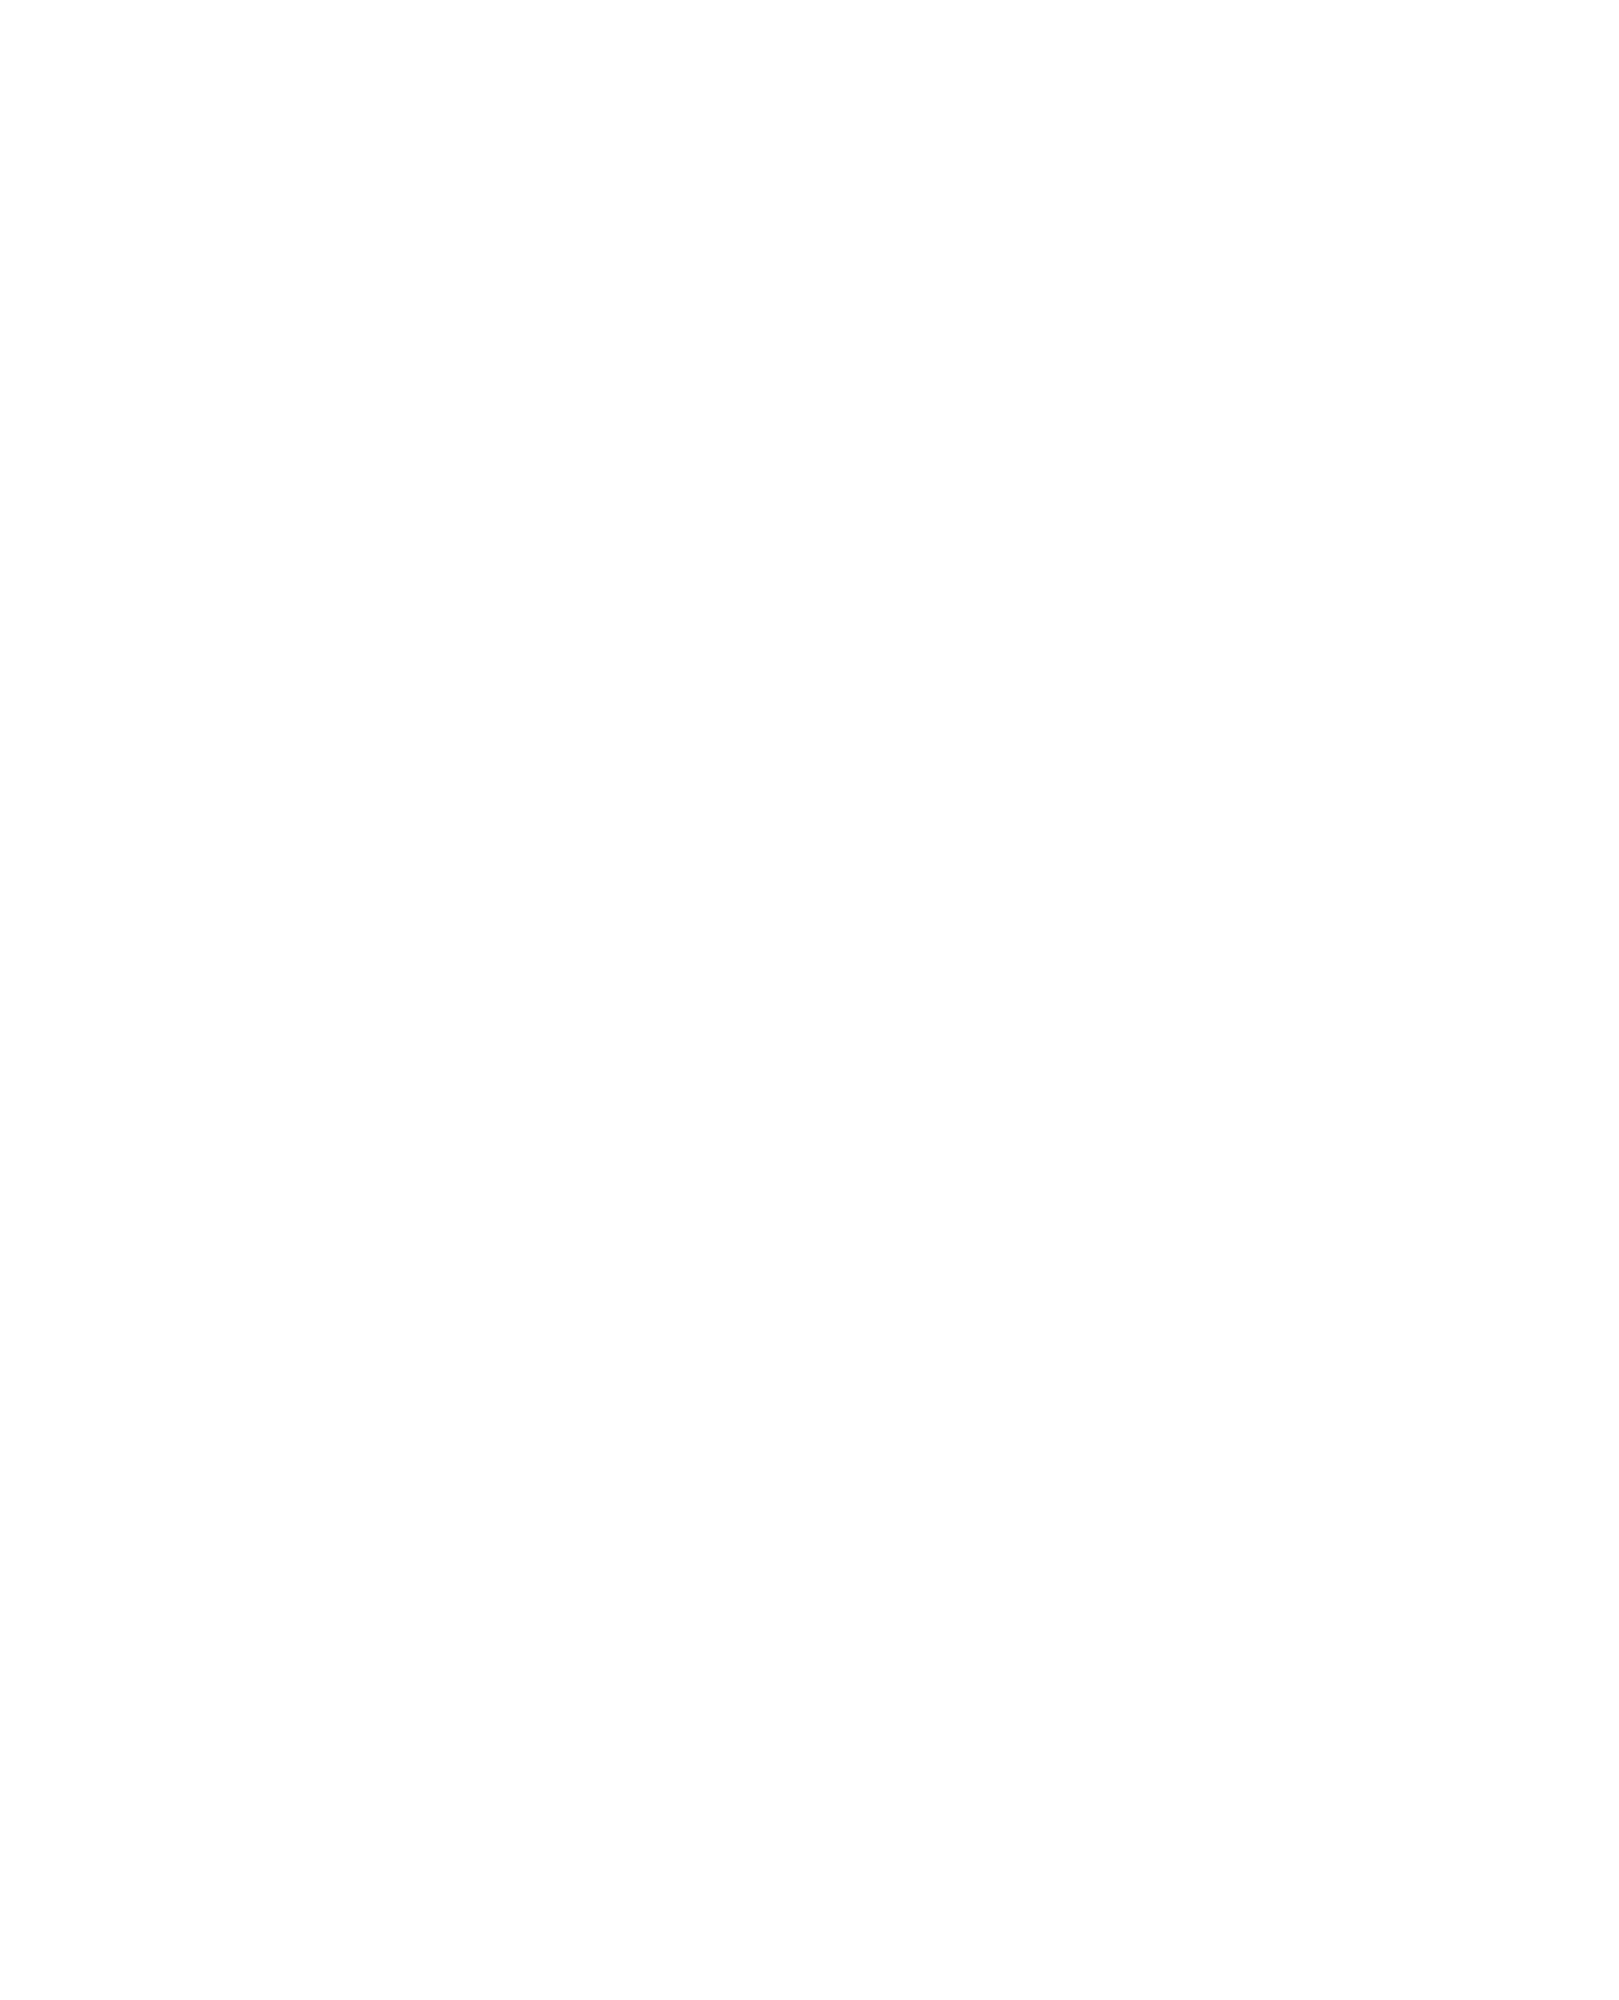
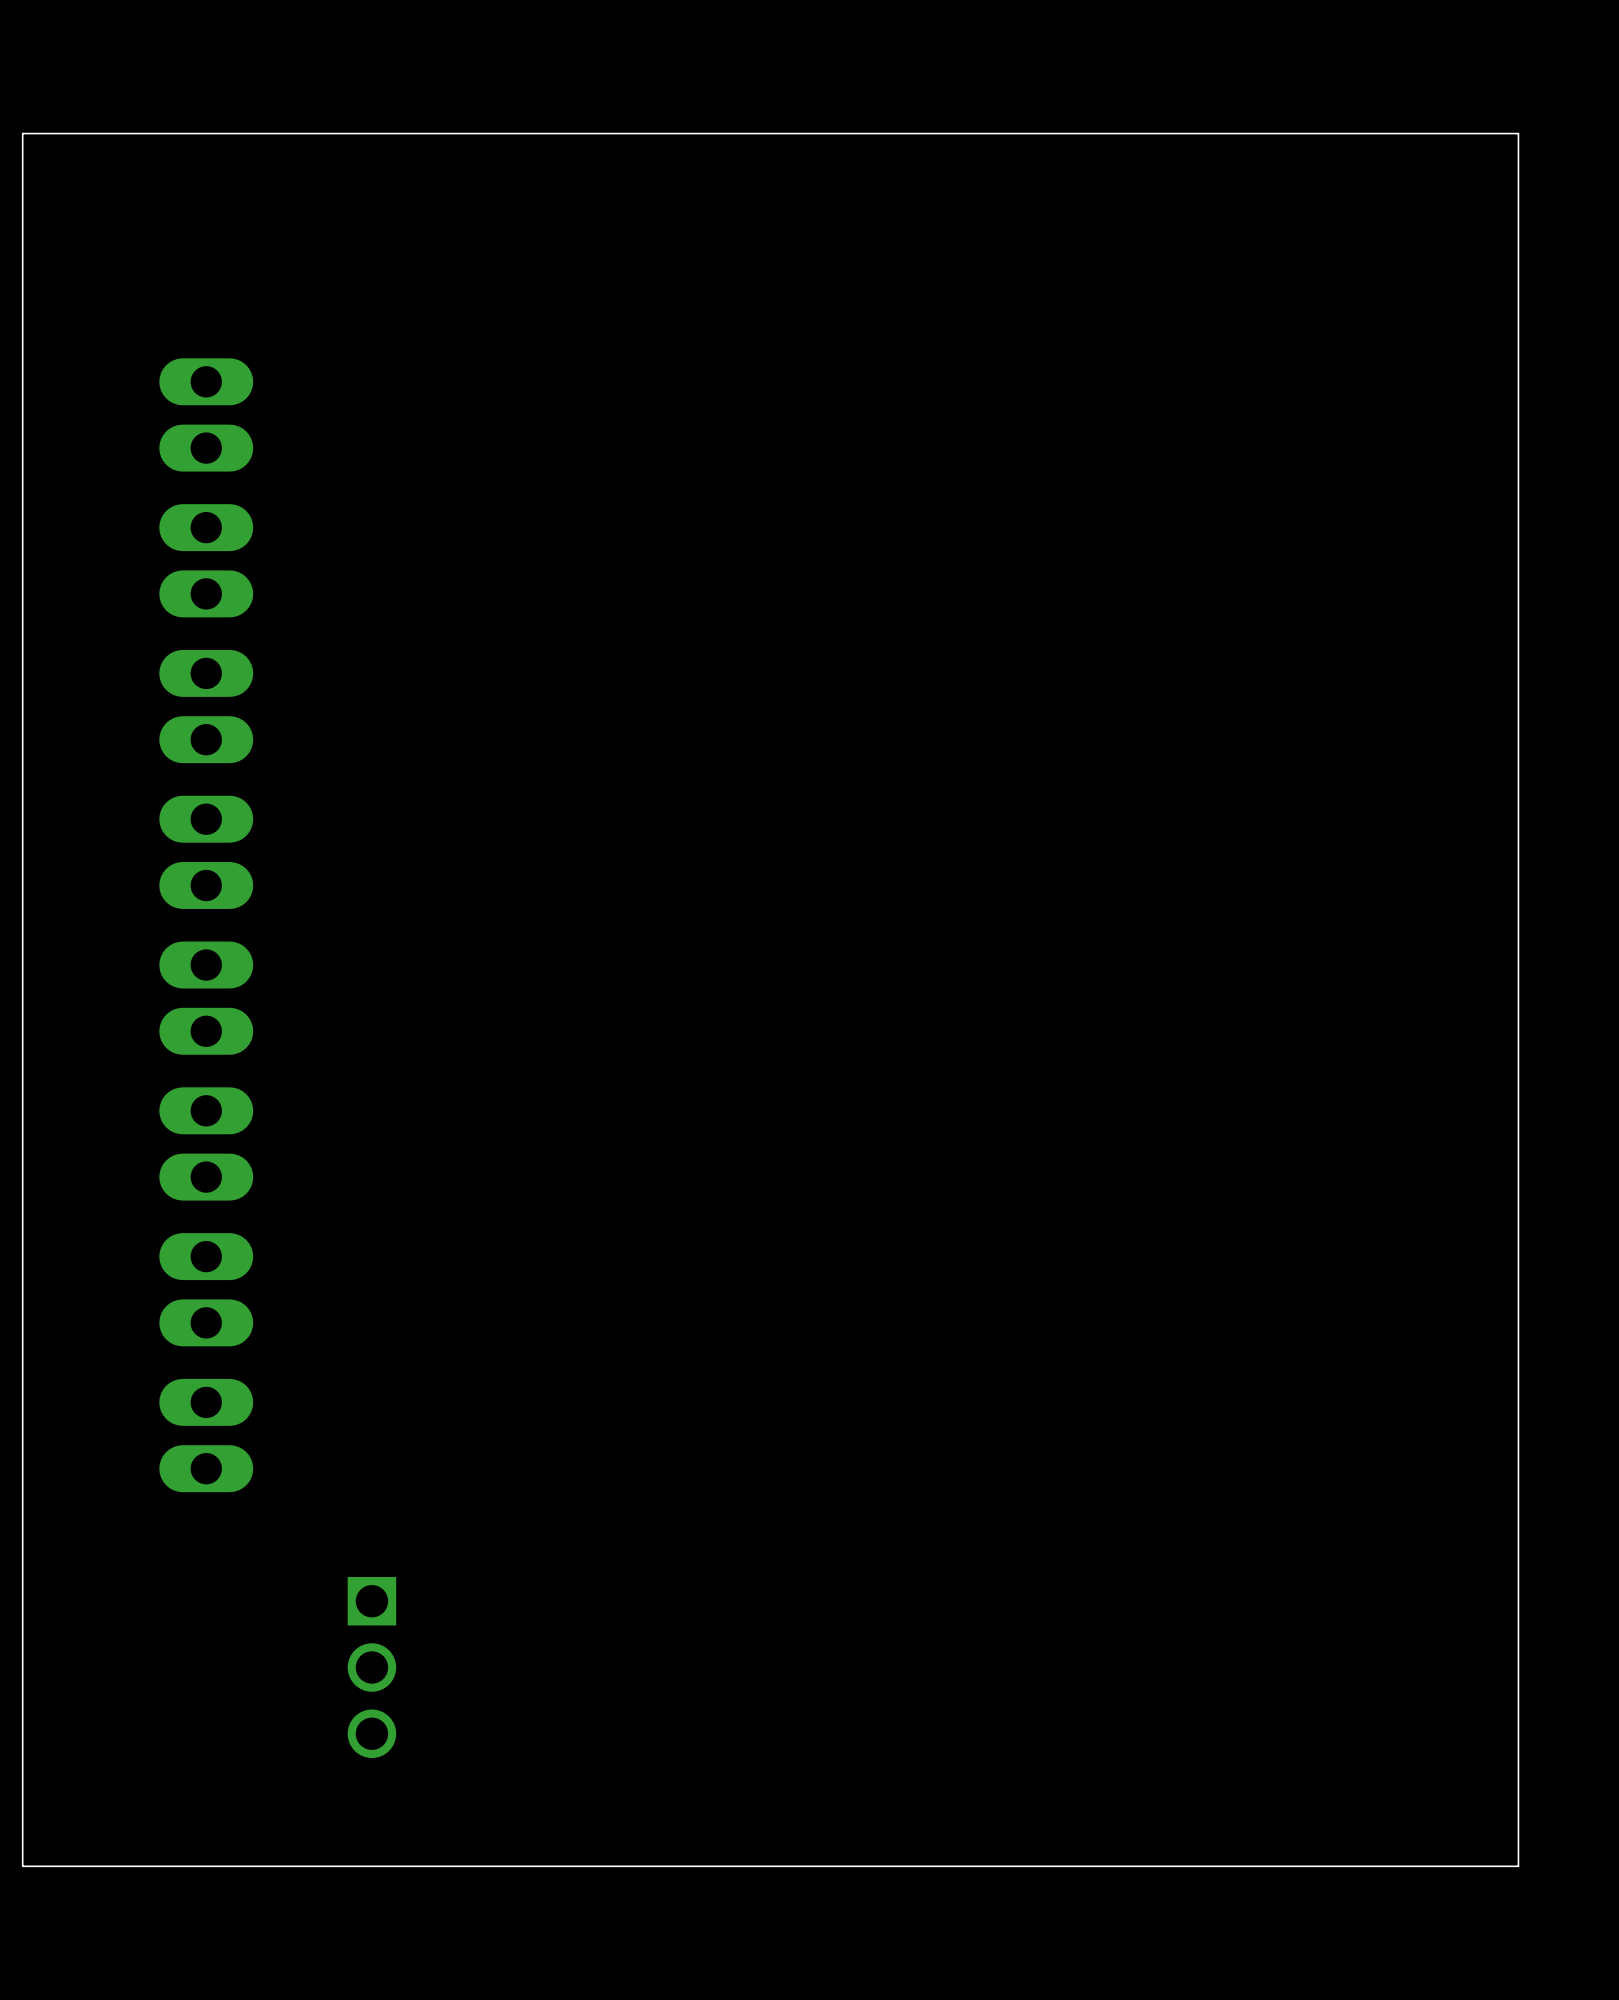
board edge: none -> (1518, 133) (22, 133) (22, 1866) (1518, 1866) (1518, 133)
part: none -> (206, 414)
part: none -> (206, 560)
part: none -> (206, 706)
part: none -> (206, 852)
part: none -> (206, 998)
part: none -> (206, 1143)
part: none -> (206, 1289)
part: none -> (206, 1435)
part: none -> (371, 1667)

